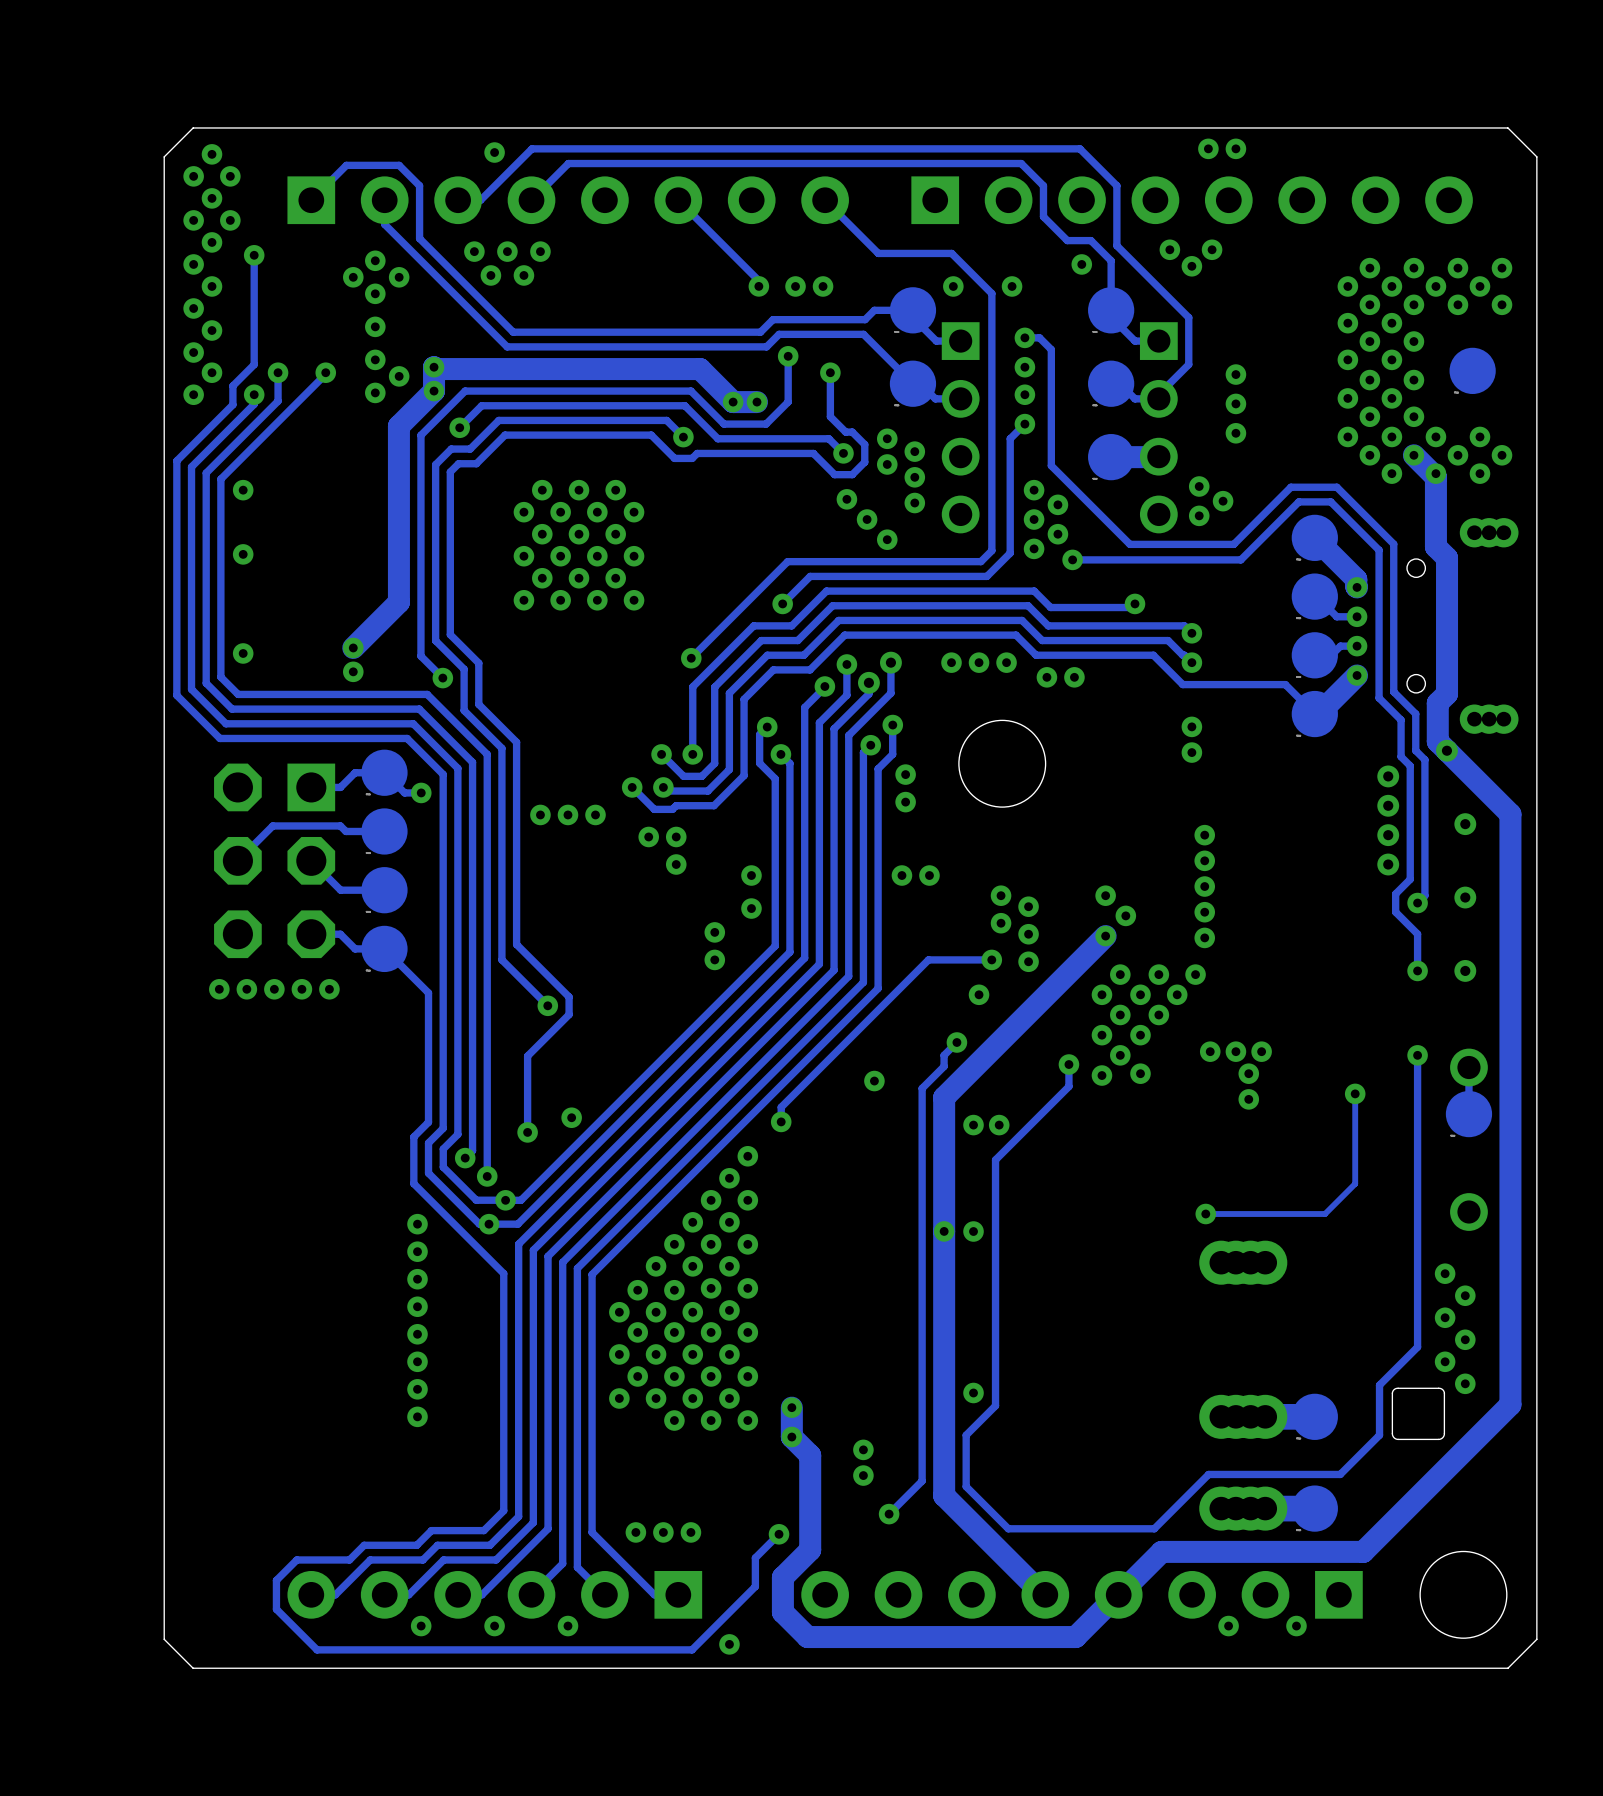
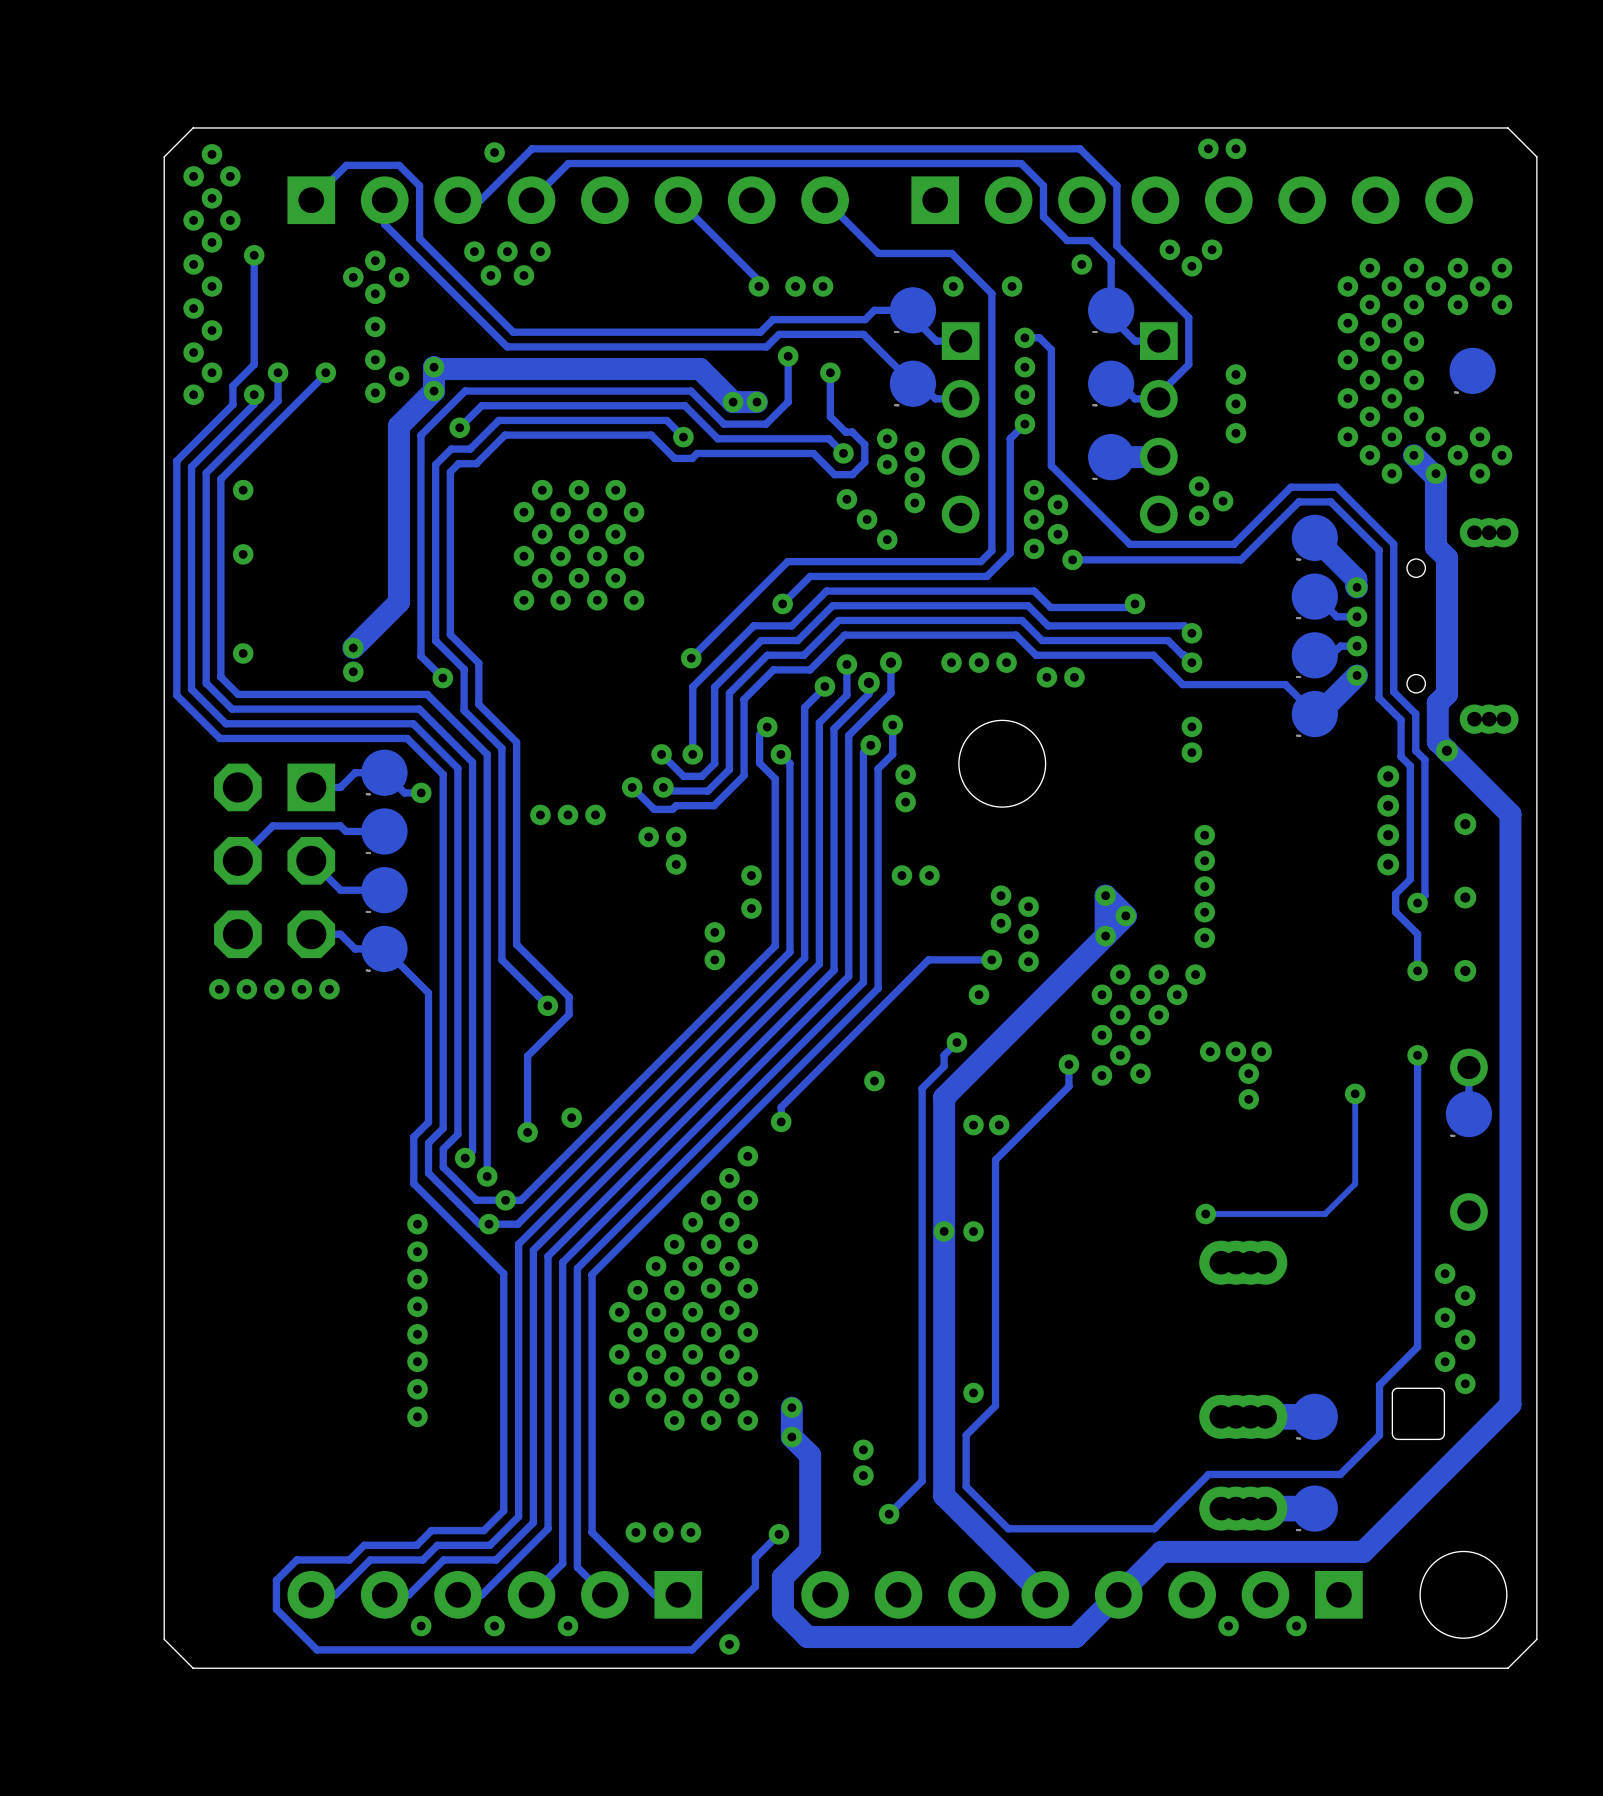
track: none -> (1105, 895) (1105, 936) (1125, 915) (1105, 895)

